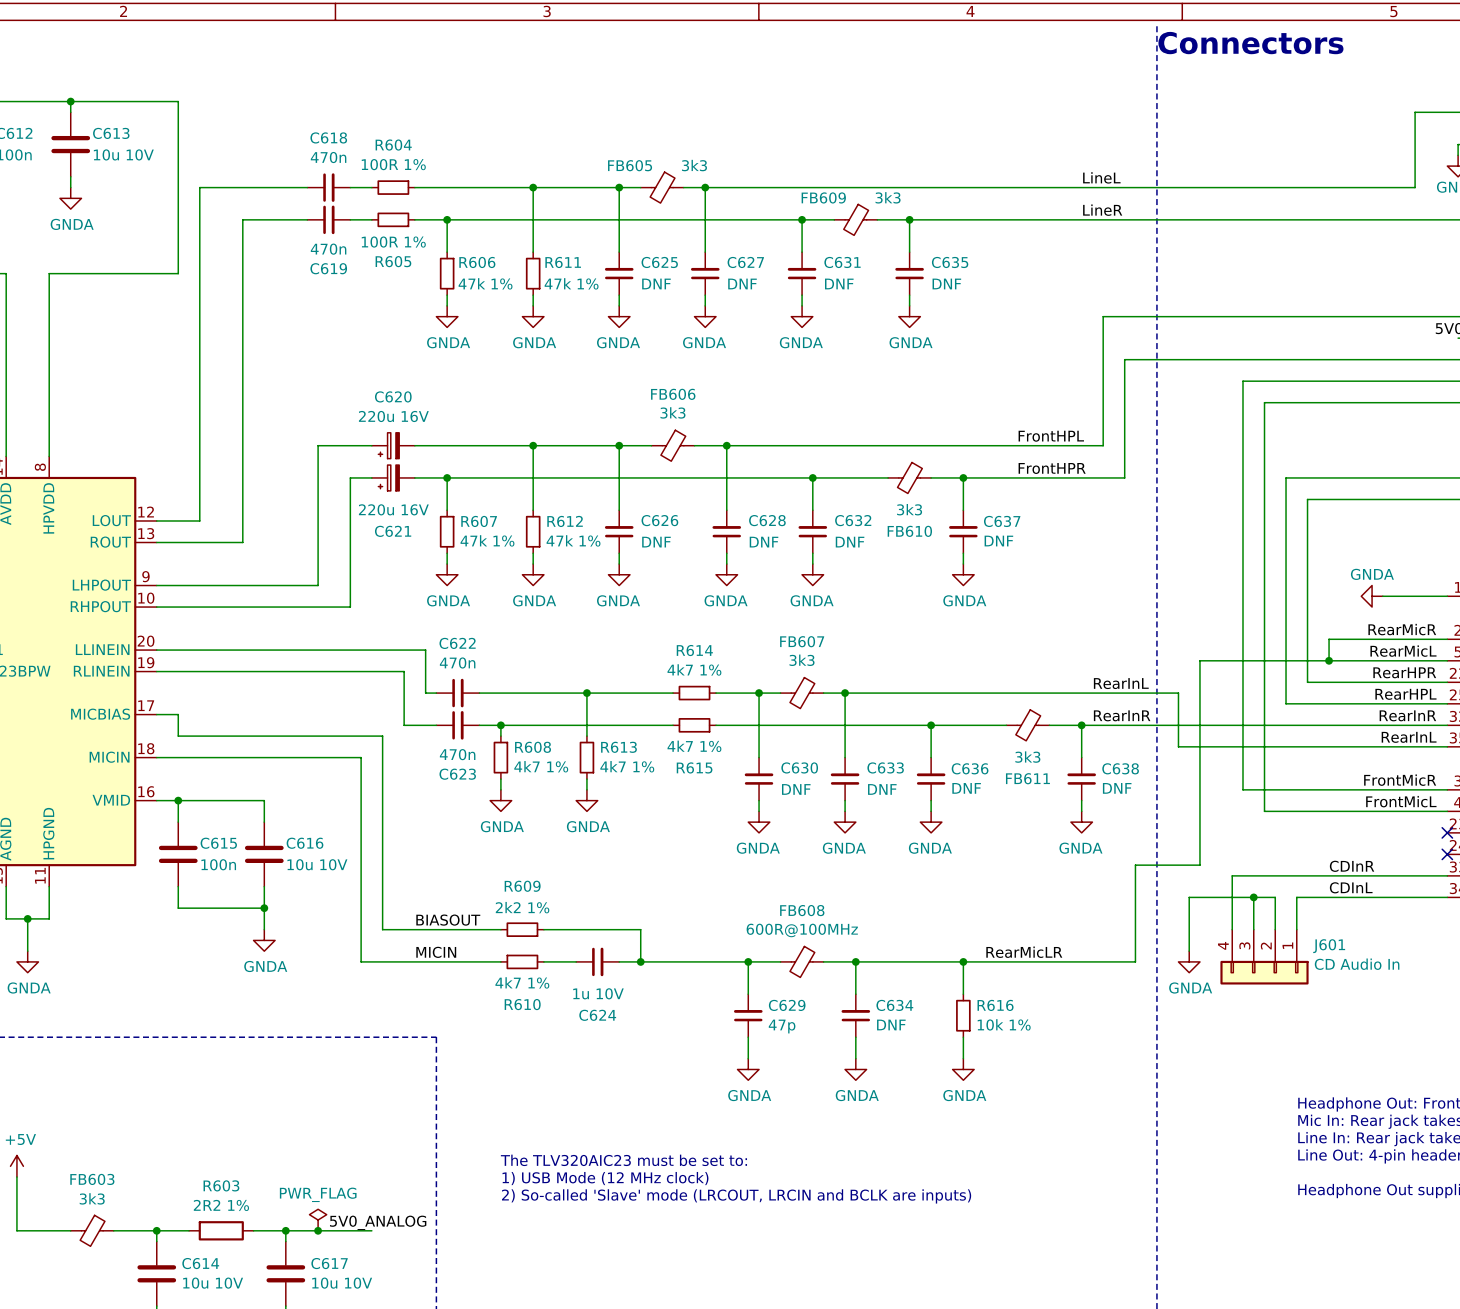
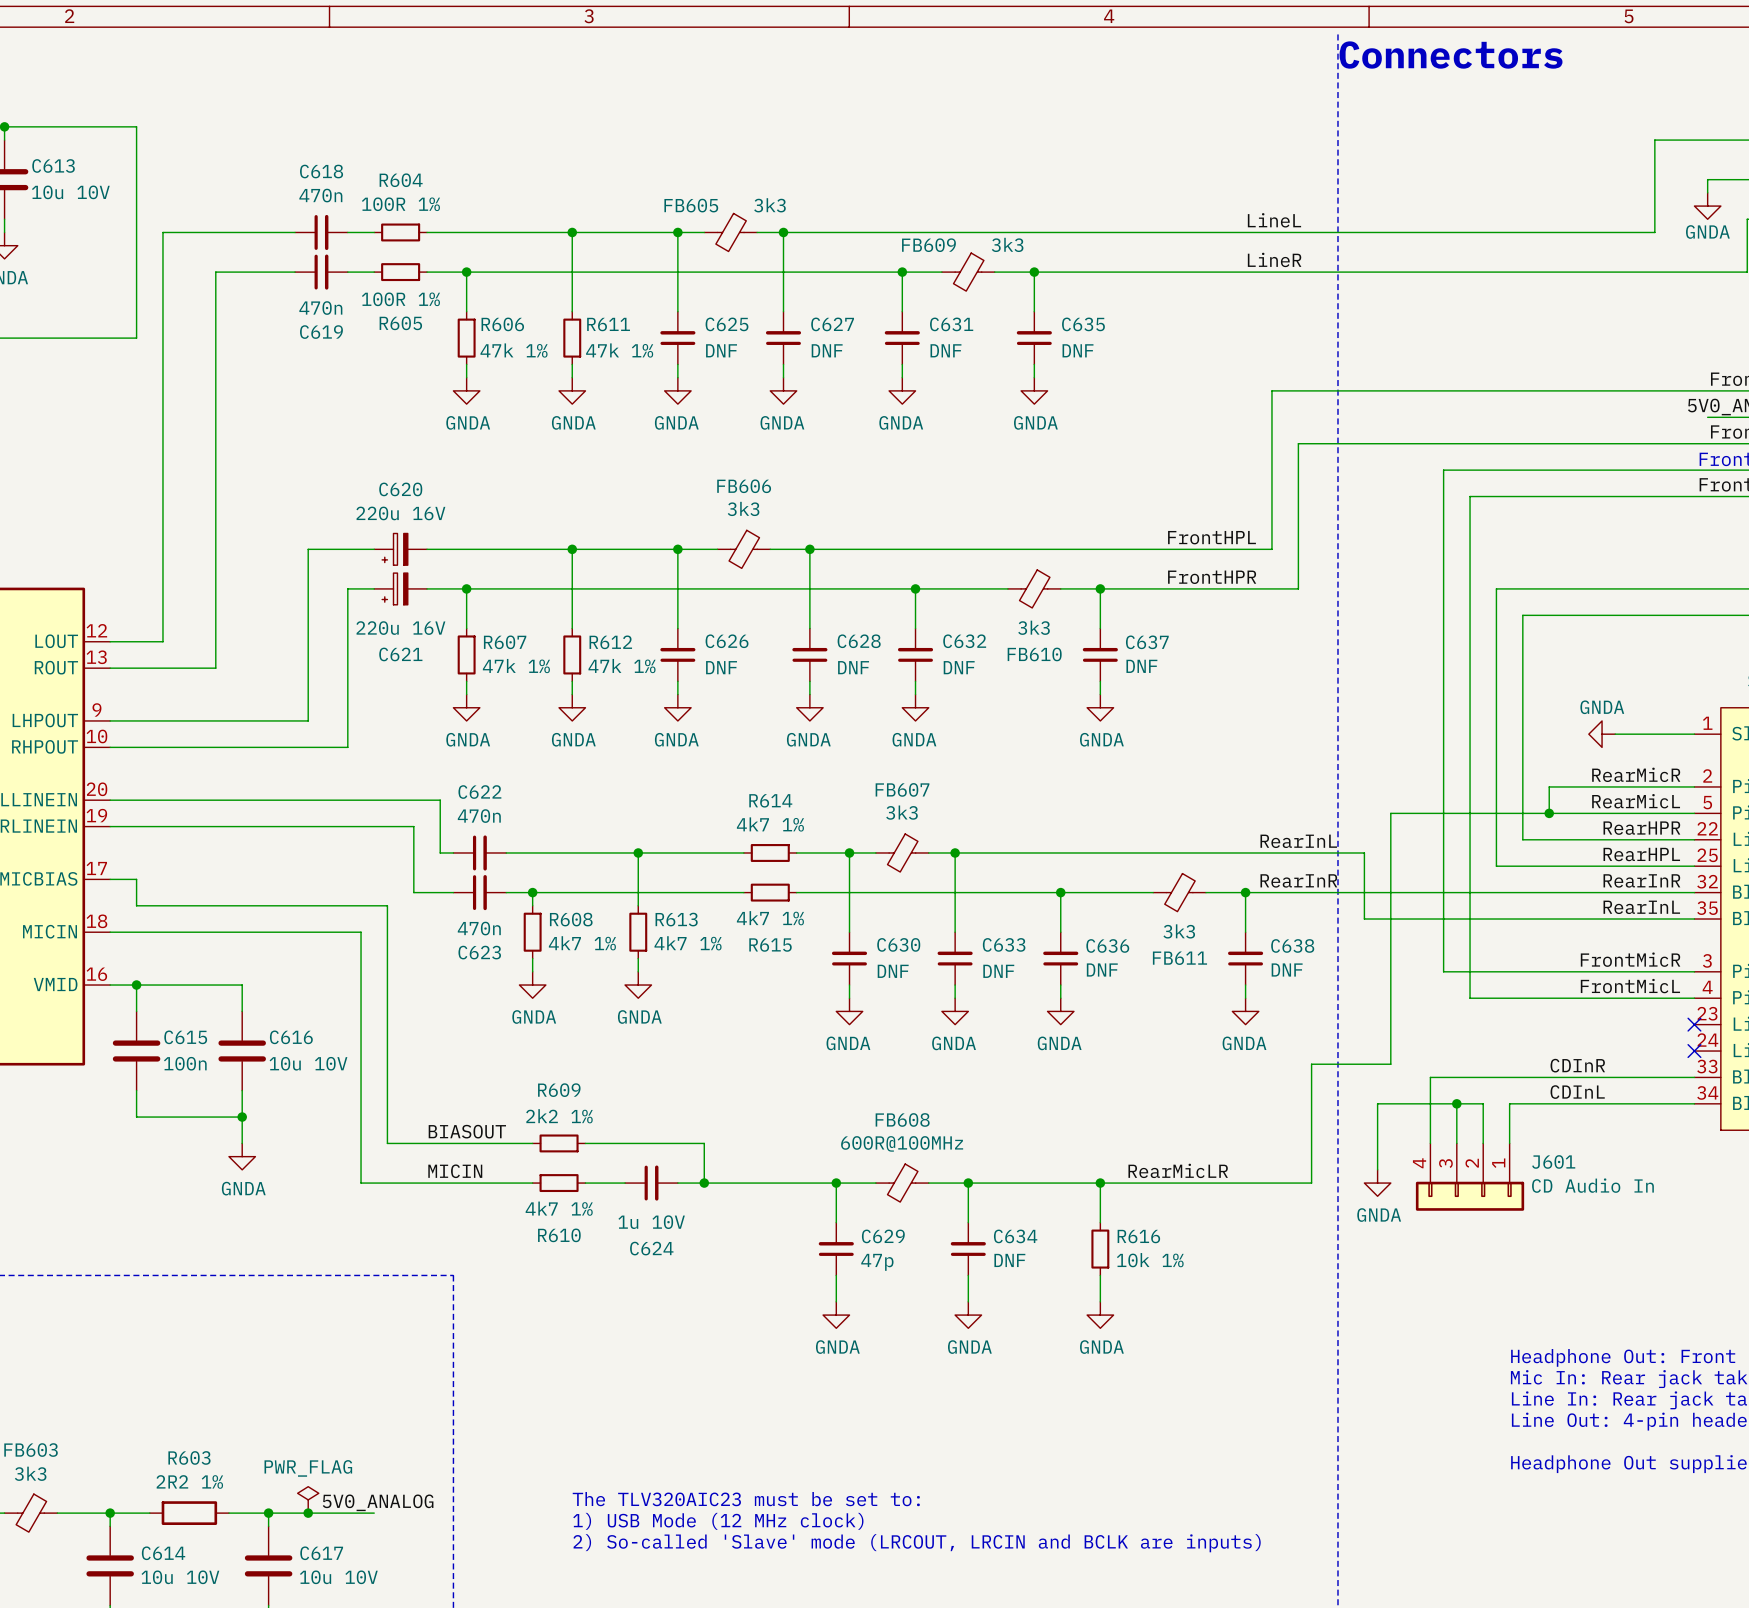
text position: The TLV320AIC23 must be set to: (623, 1160) -> The TLV320AIC23 must be set to: (746, 1499)
text position: 1) USB Mode (12 MHz clock) (605, 1178) -> 1) USB Mode (12 MHz clock) (718, 1521)
text position: 2) So-called 'Slave' mode (LRCOUT, LRCIN and BCLK are inputs) (736, 1196) -> 2) So-called 'Slave' mode (LRCOUT, LRCIN and BCLK are inputs) (917, 1543)

